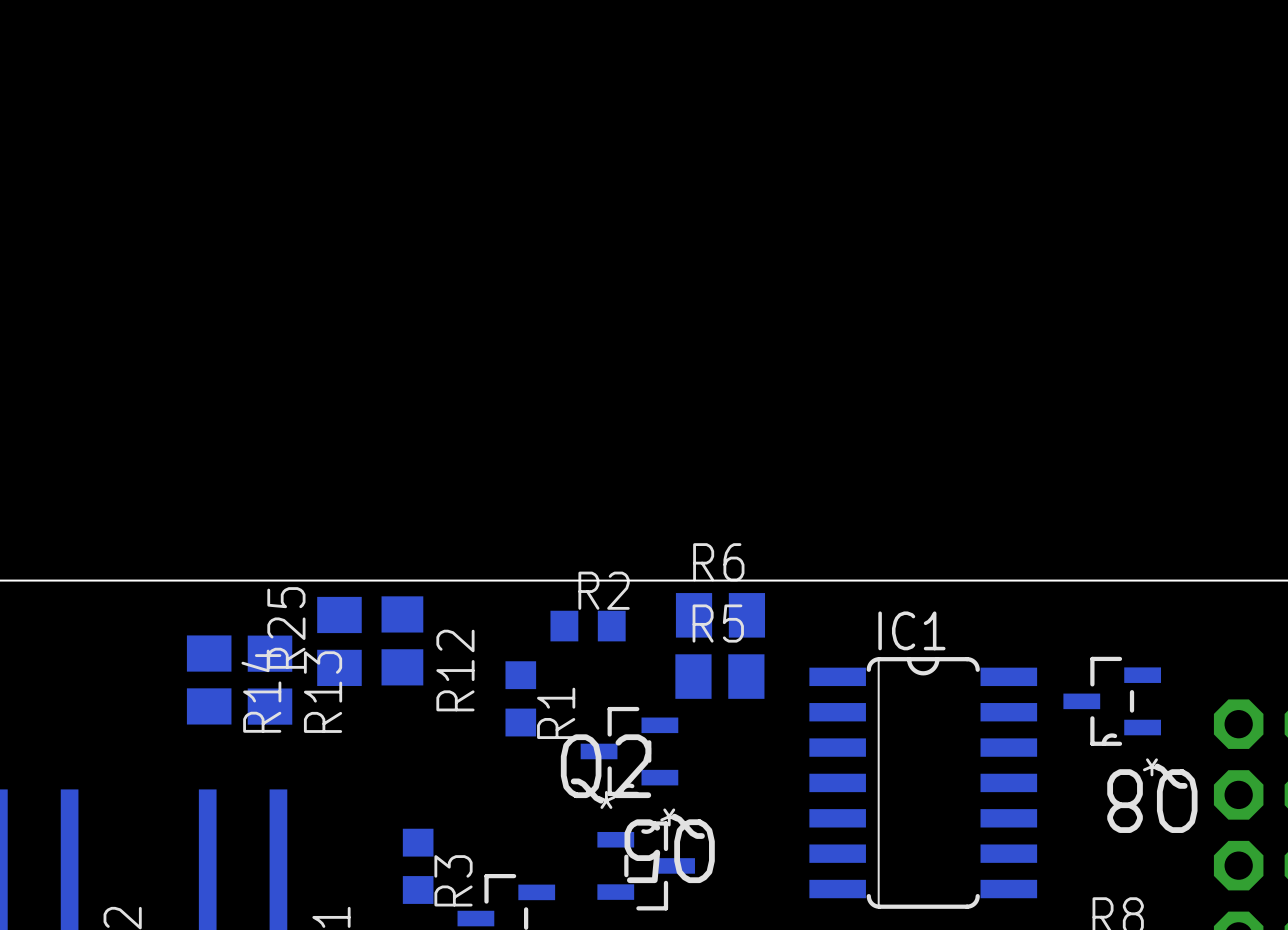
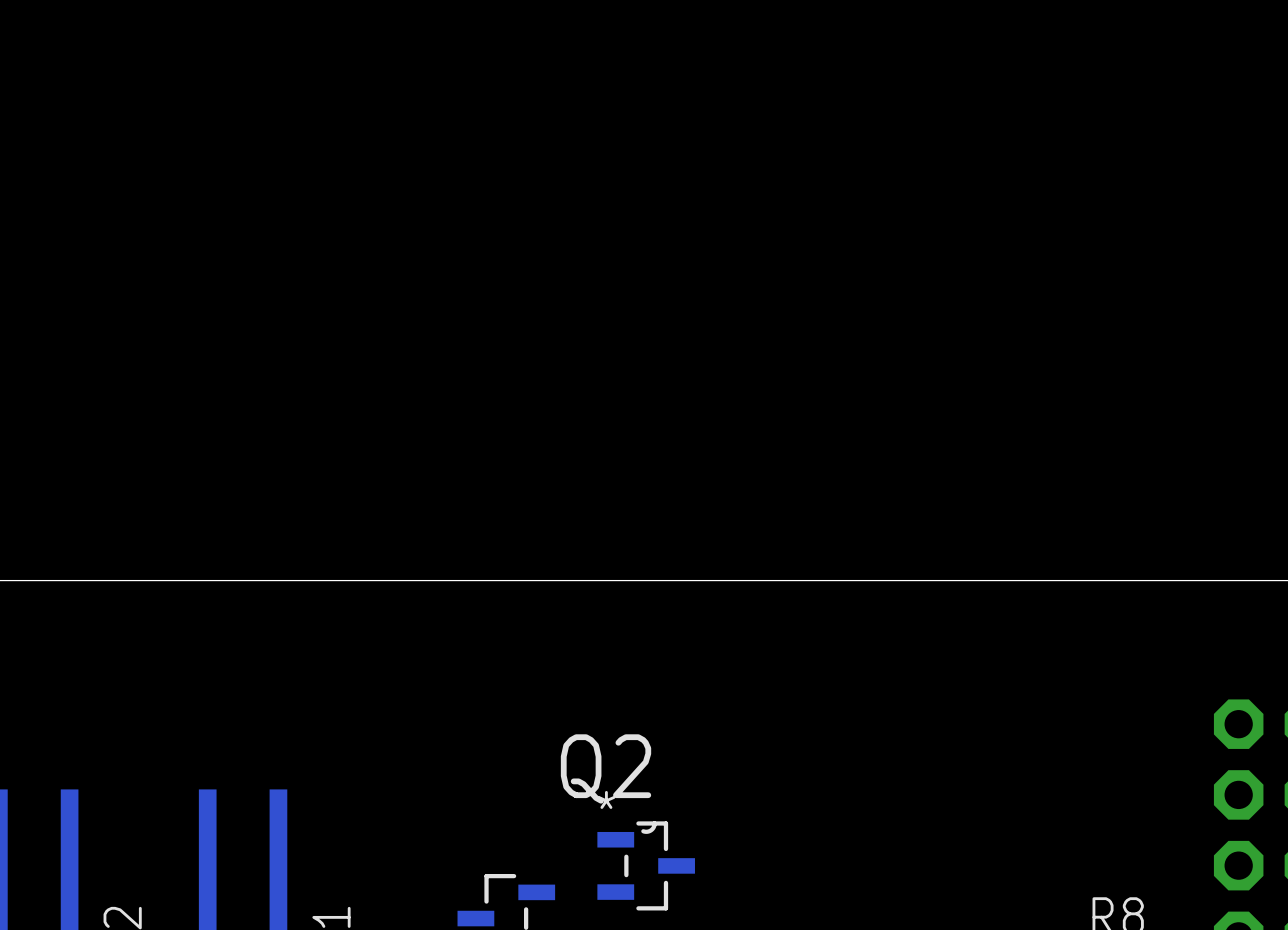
R6: (720, 615) -> none
R2: (588, 626) -> none
R12: (402, 640) -> none
R25: (339, 641) -> none
R5: (719, 676) -> none
R14: (209, 679) -> none
R13: (269, 680) -> none
R1: (520, 698) -> none
Q8: (1112, 701) -> none
Q5: (629, 751) -> none
IC1: (923, 782) -> none
R3: (418, 866) -> none

